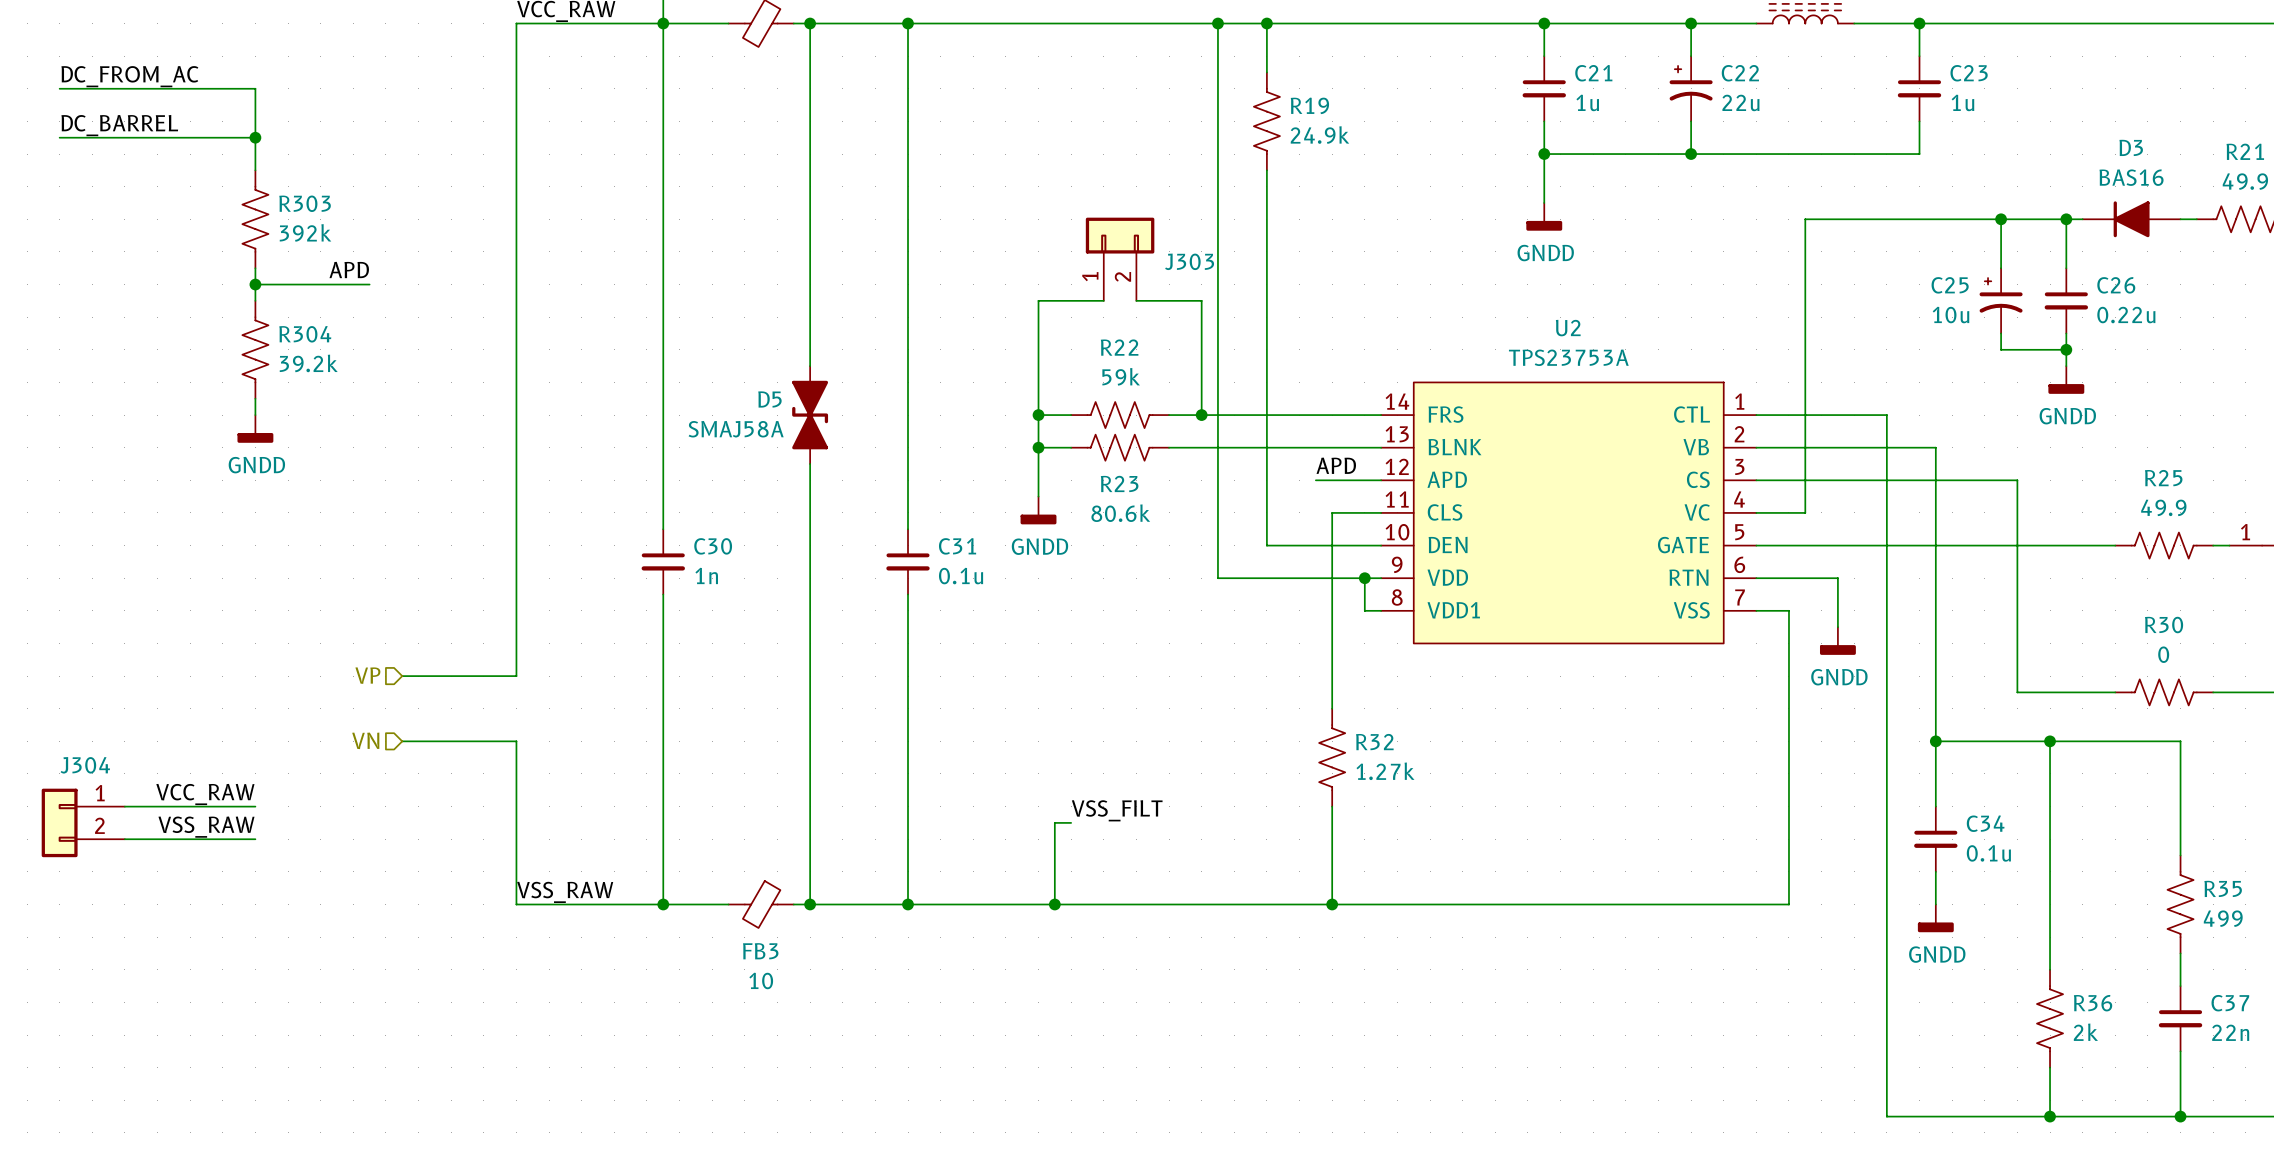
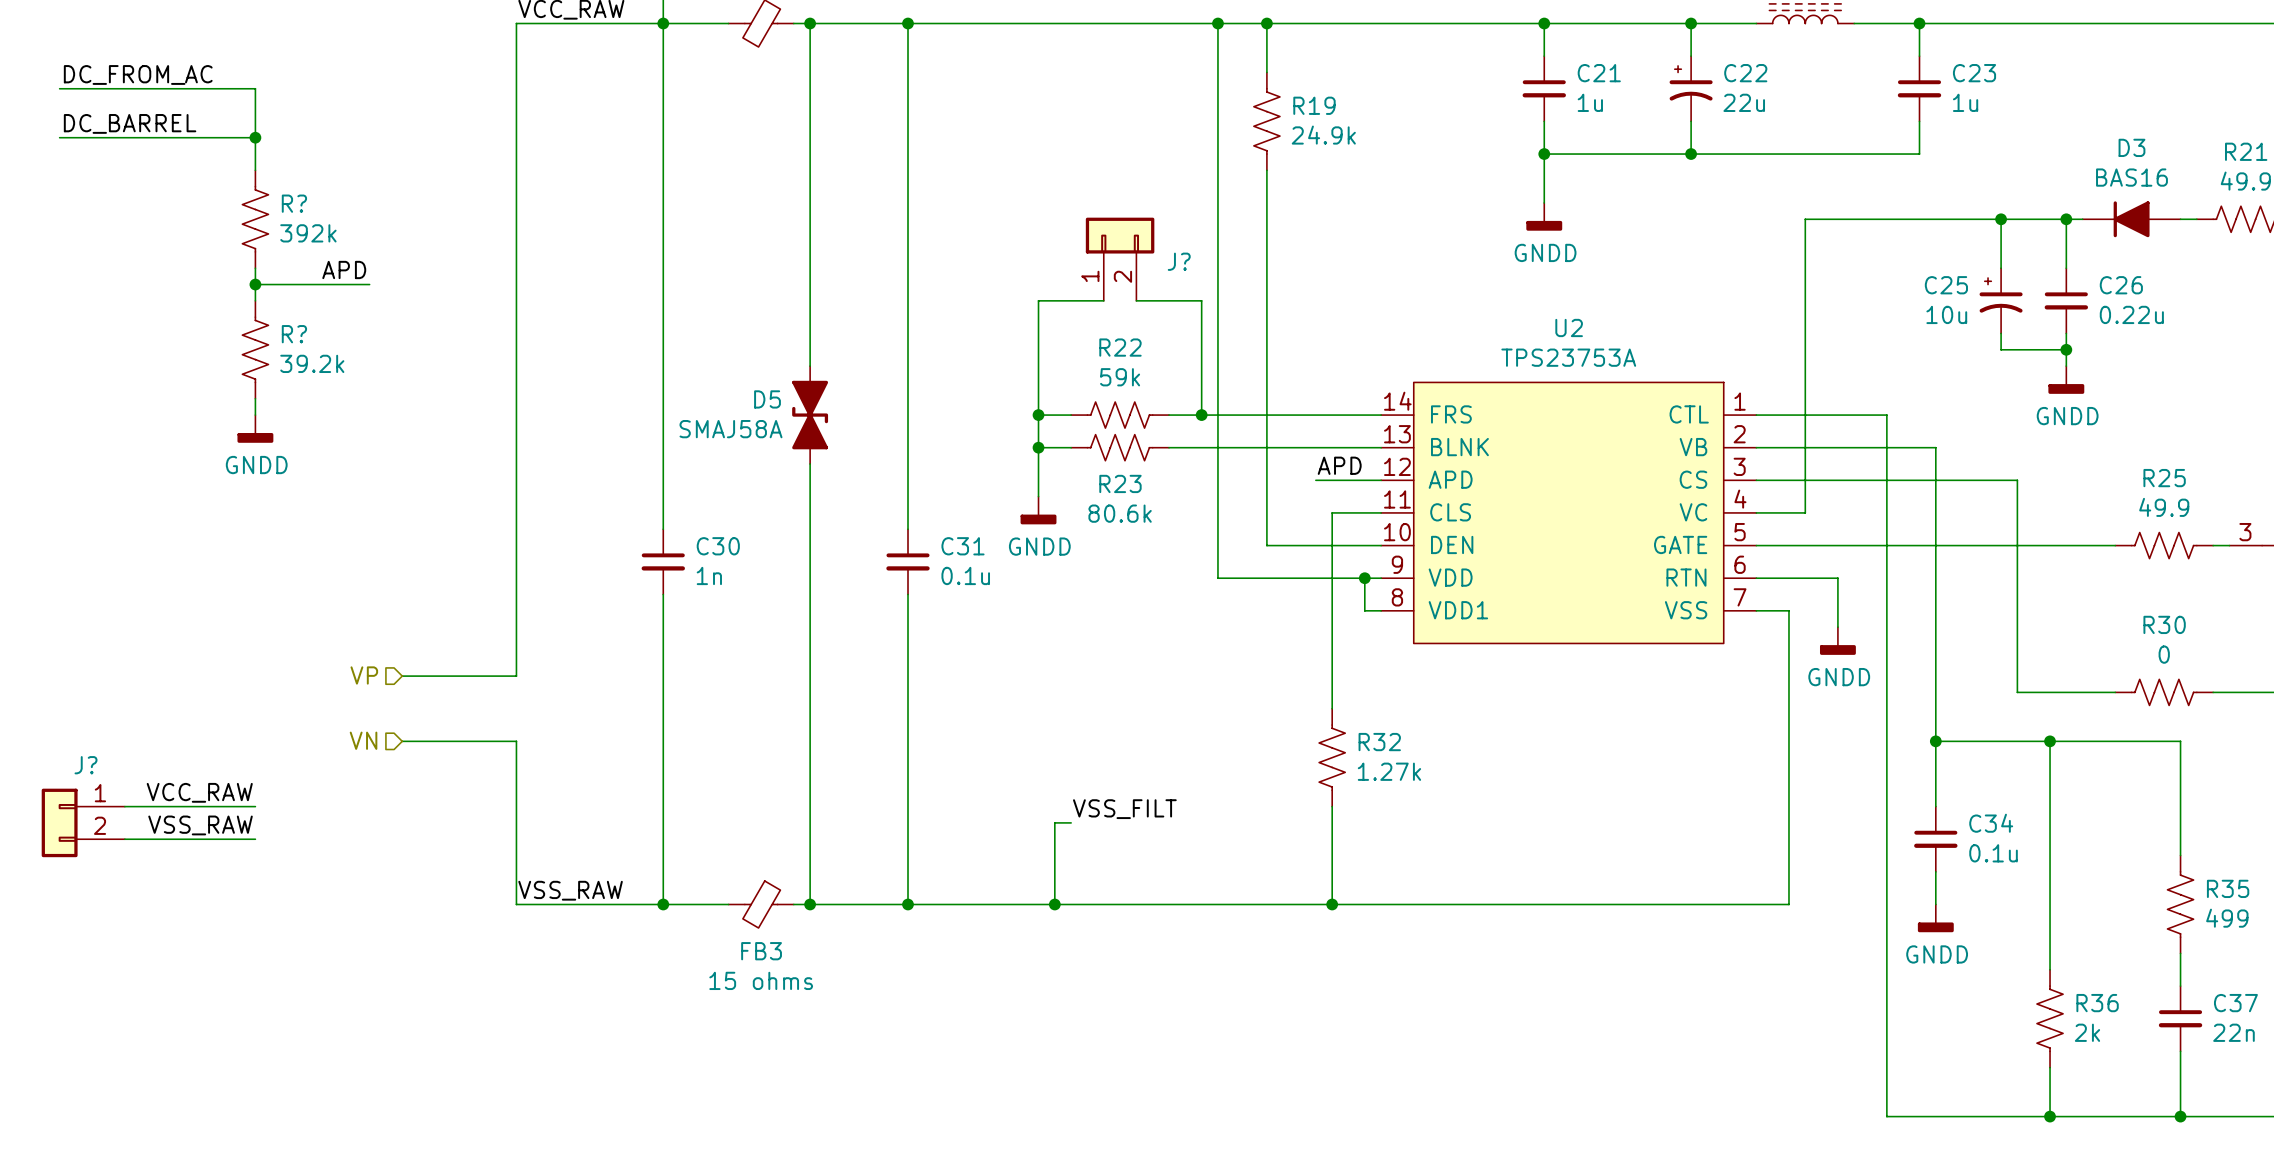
R303 name: R303 (305, 203) -> R? (294, 203)
J303 name: J303 (1189, 261) -> J? (1179, 261)
R304 name: R304 (305, 334) -> R? (294, 334)
part pin number: 1 (2245, 532) -> 3 (2245, 532)
J304 name: J304 (85, 765) -> J? (86, 765)
FB3 value: 10 (761, 980) -> 15 ohms (761, 980)

